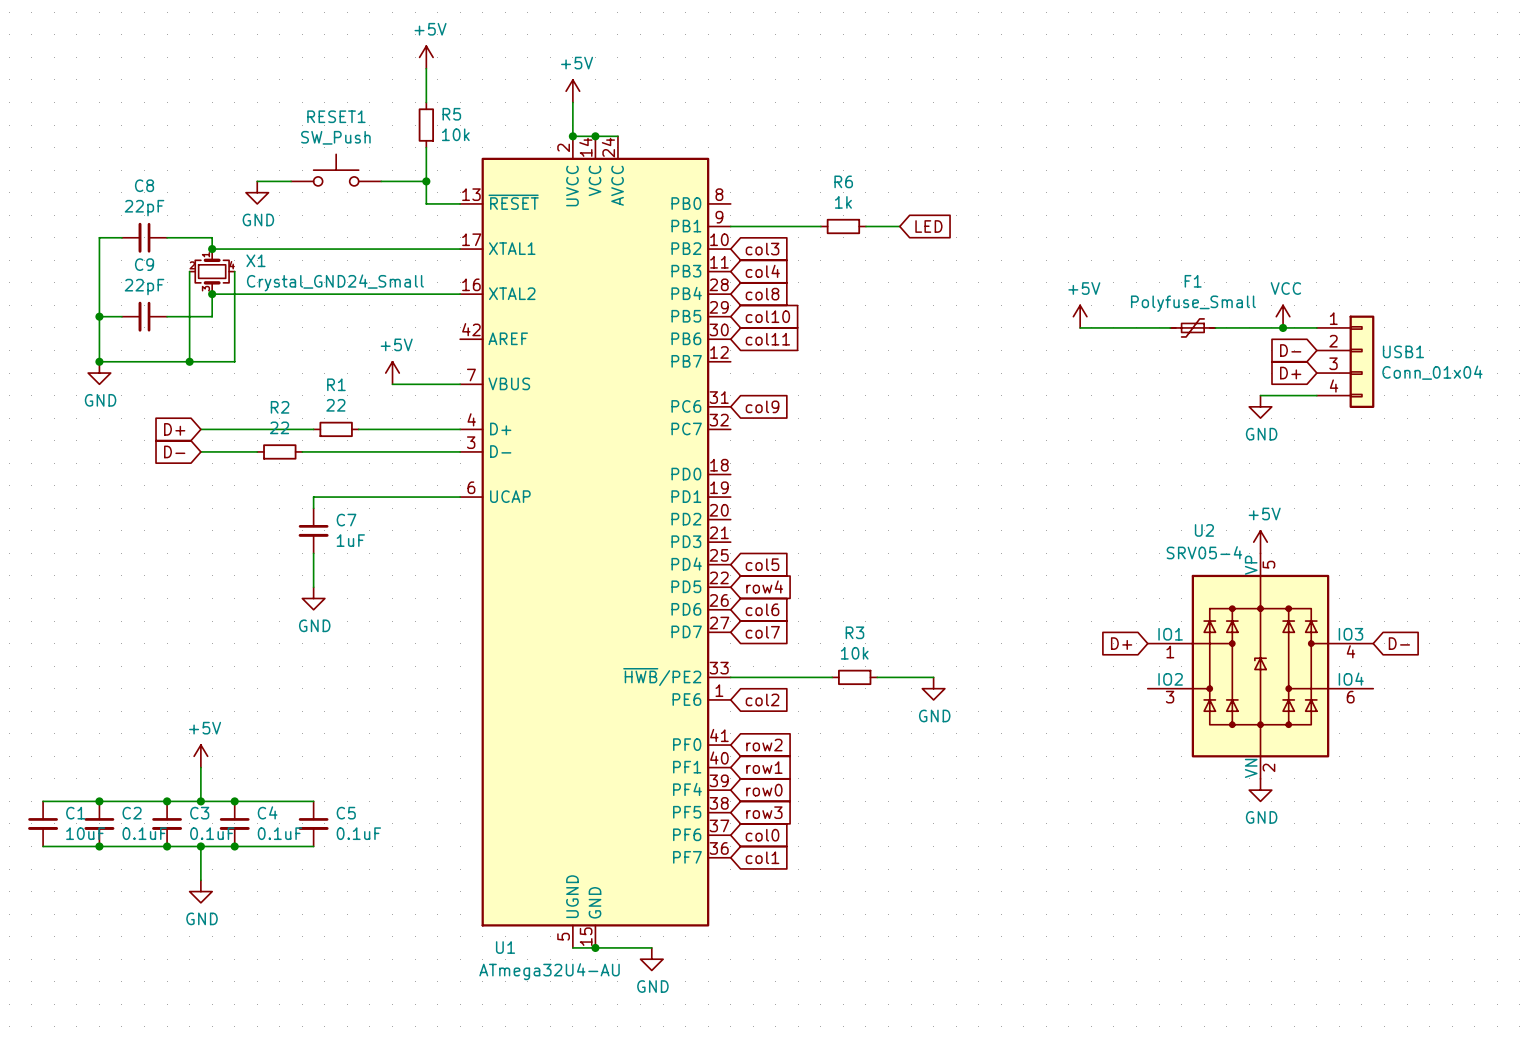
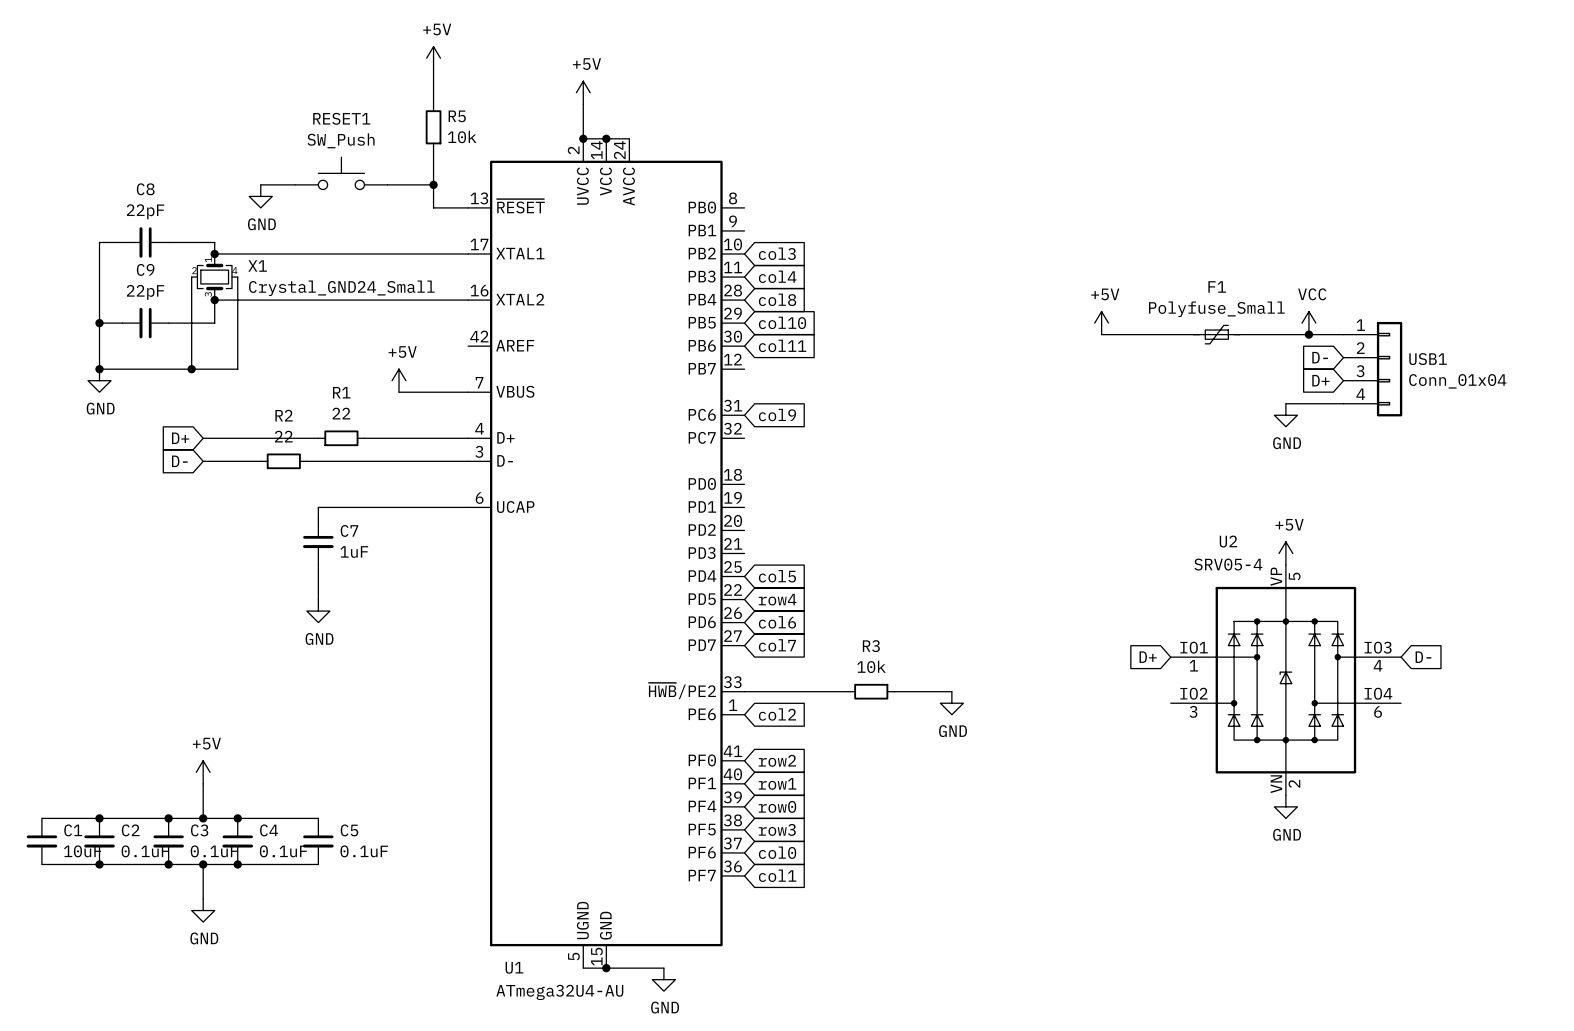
wire: (730, 226) (820, 226) -> none
R6: 1k (843, 226) -> none
wire: (865, 226) (899, 226) -> none
global label: LED (928, 226) -> none

